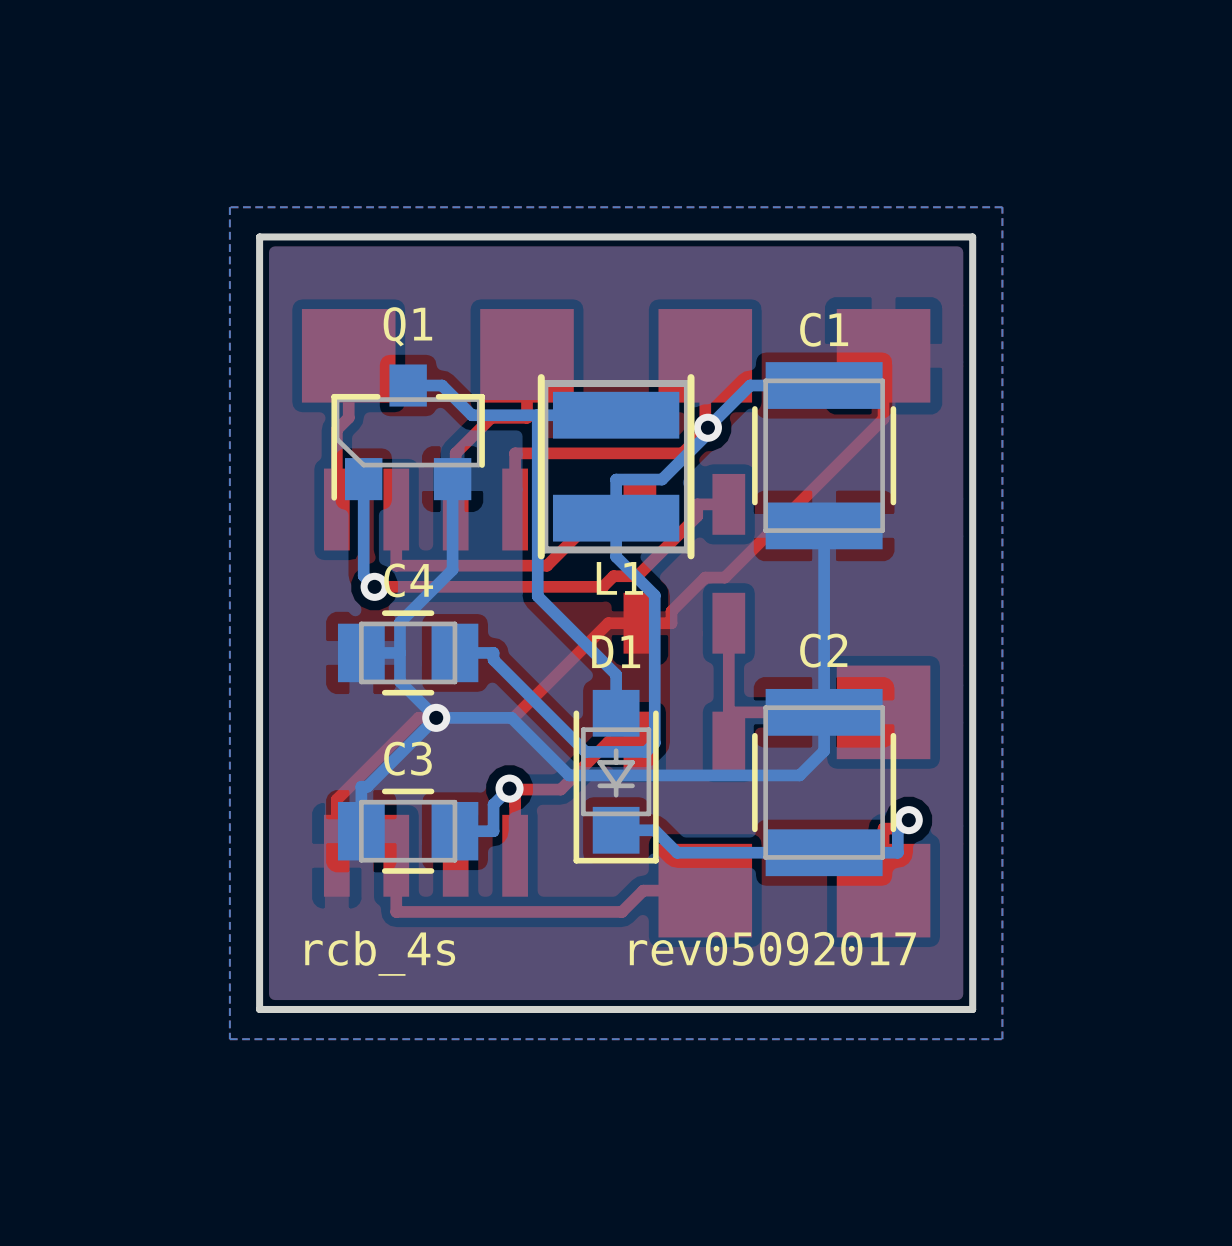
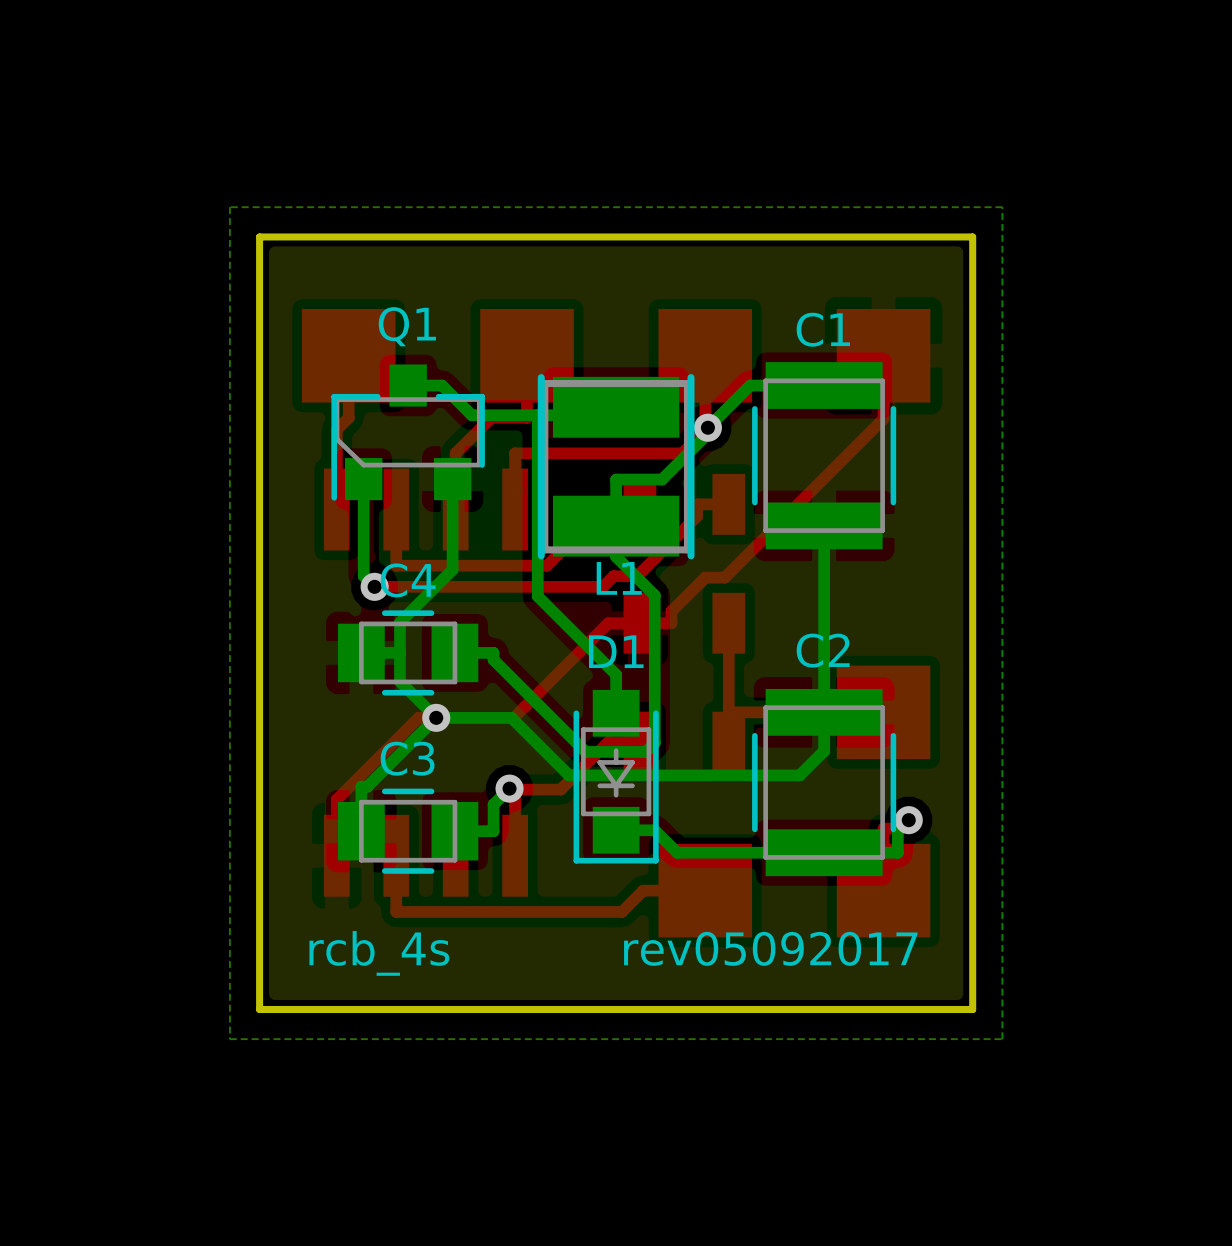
L1 footprint: [537, 374, 695, 560] -> [537, 374, 695, 560]

